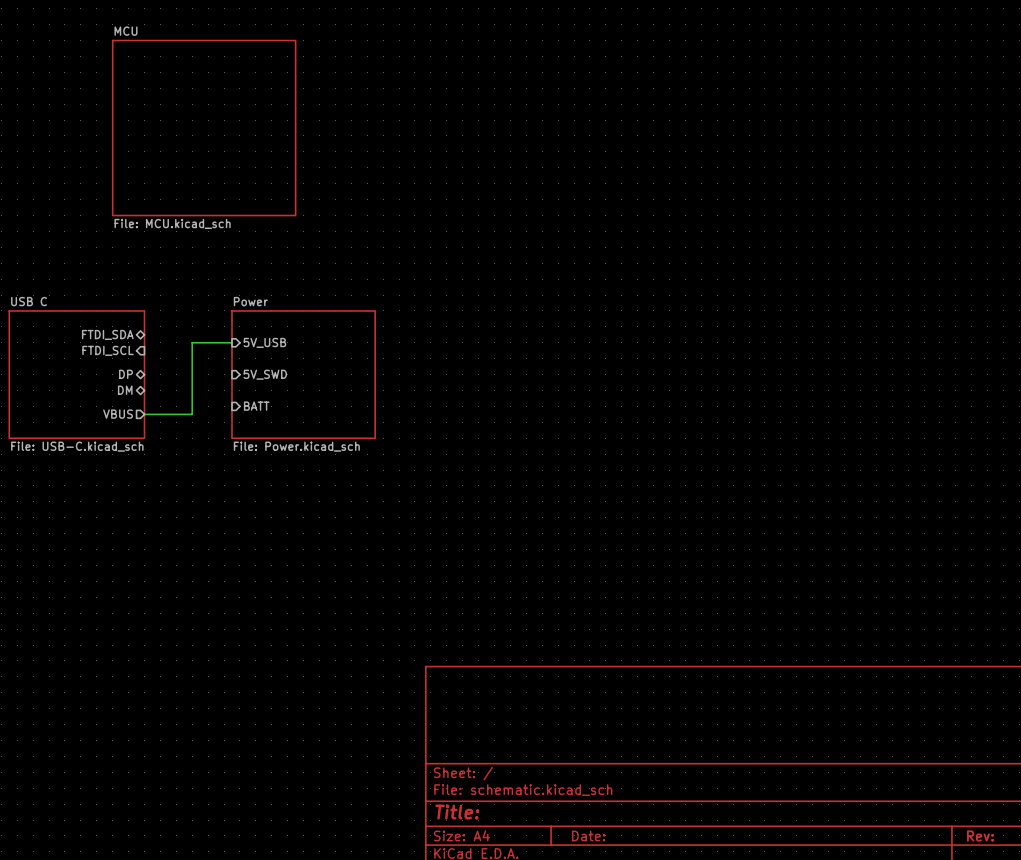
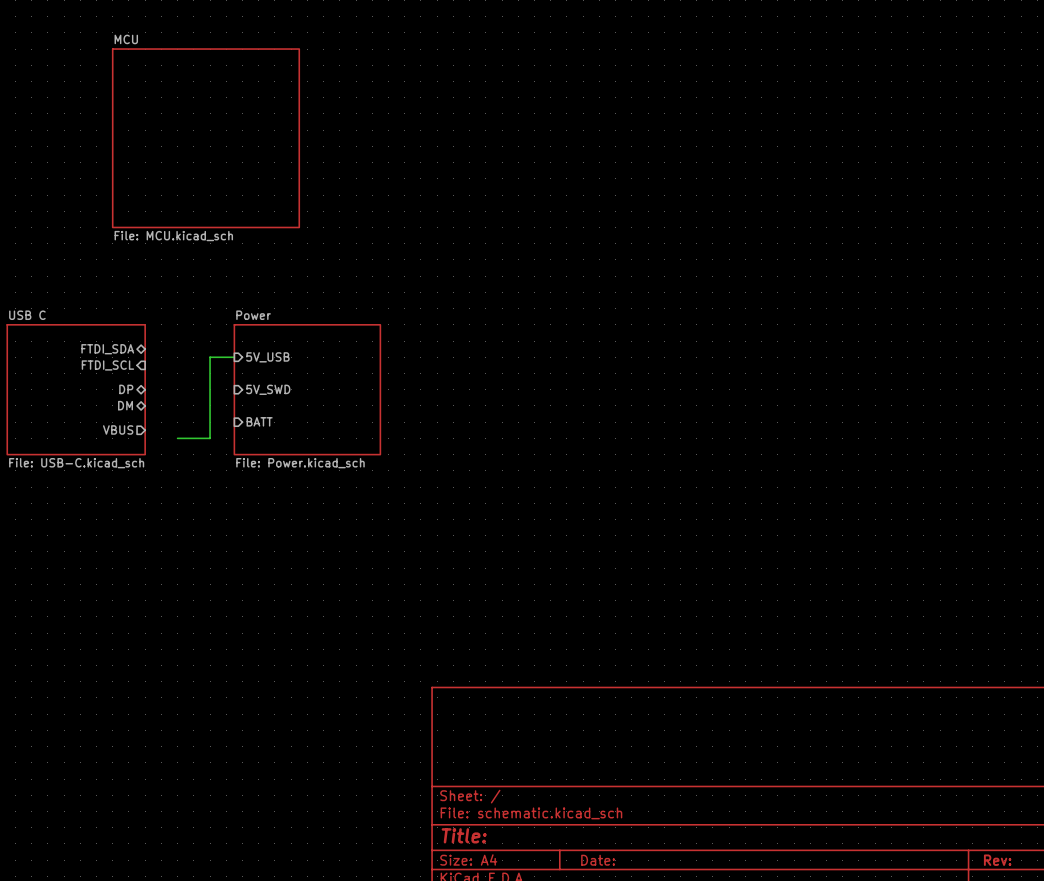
wire: (208, 342) (192, 342) (192, 414) (144, 414) -> (210, 357) (210, 438) (177, 438)

